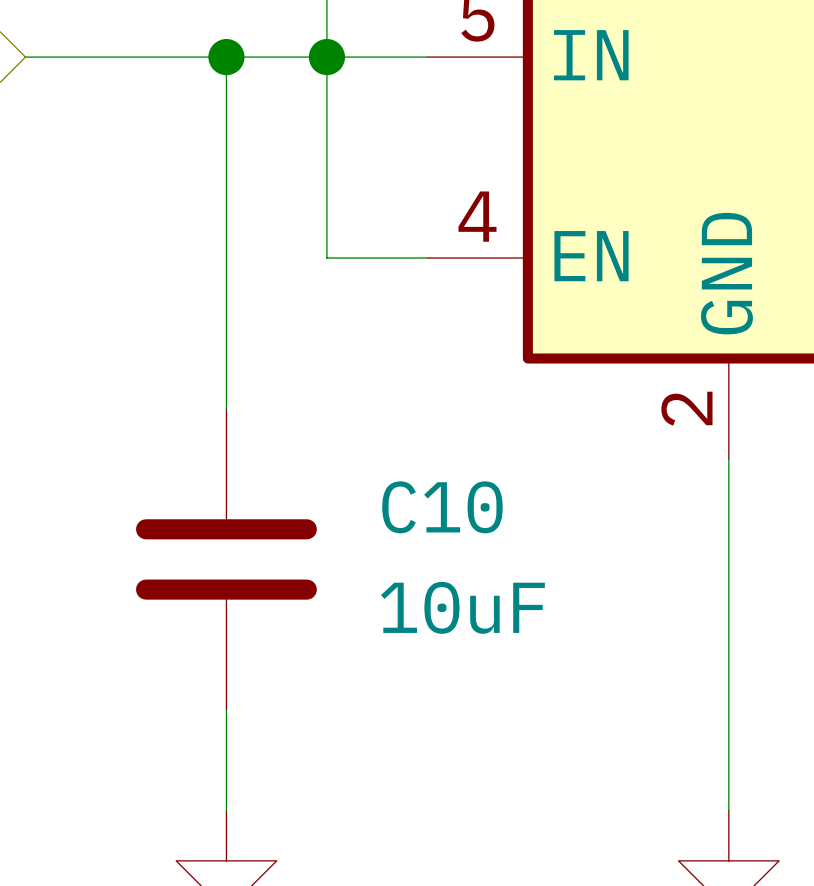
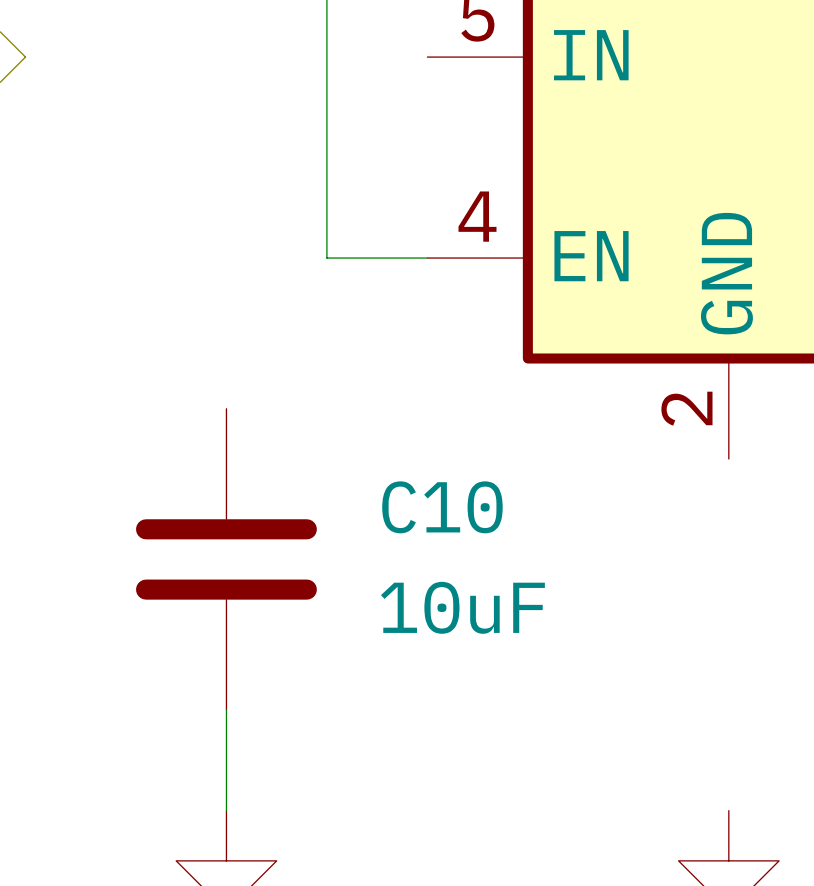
wire: (25, 57) (427, 57) -> none
wire: (226, 57) (226, 408) -> none
junction: (226, 57) -> none
junction: (326, 57) -> none
wire: (728, 458) (728, 810) -> none

